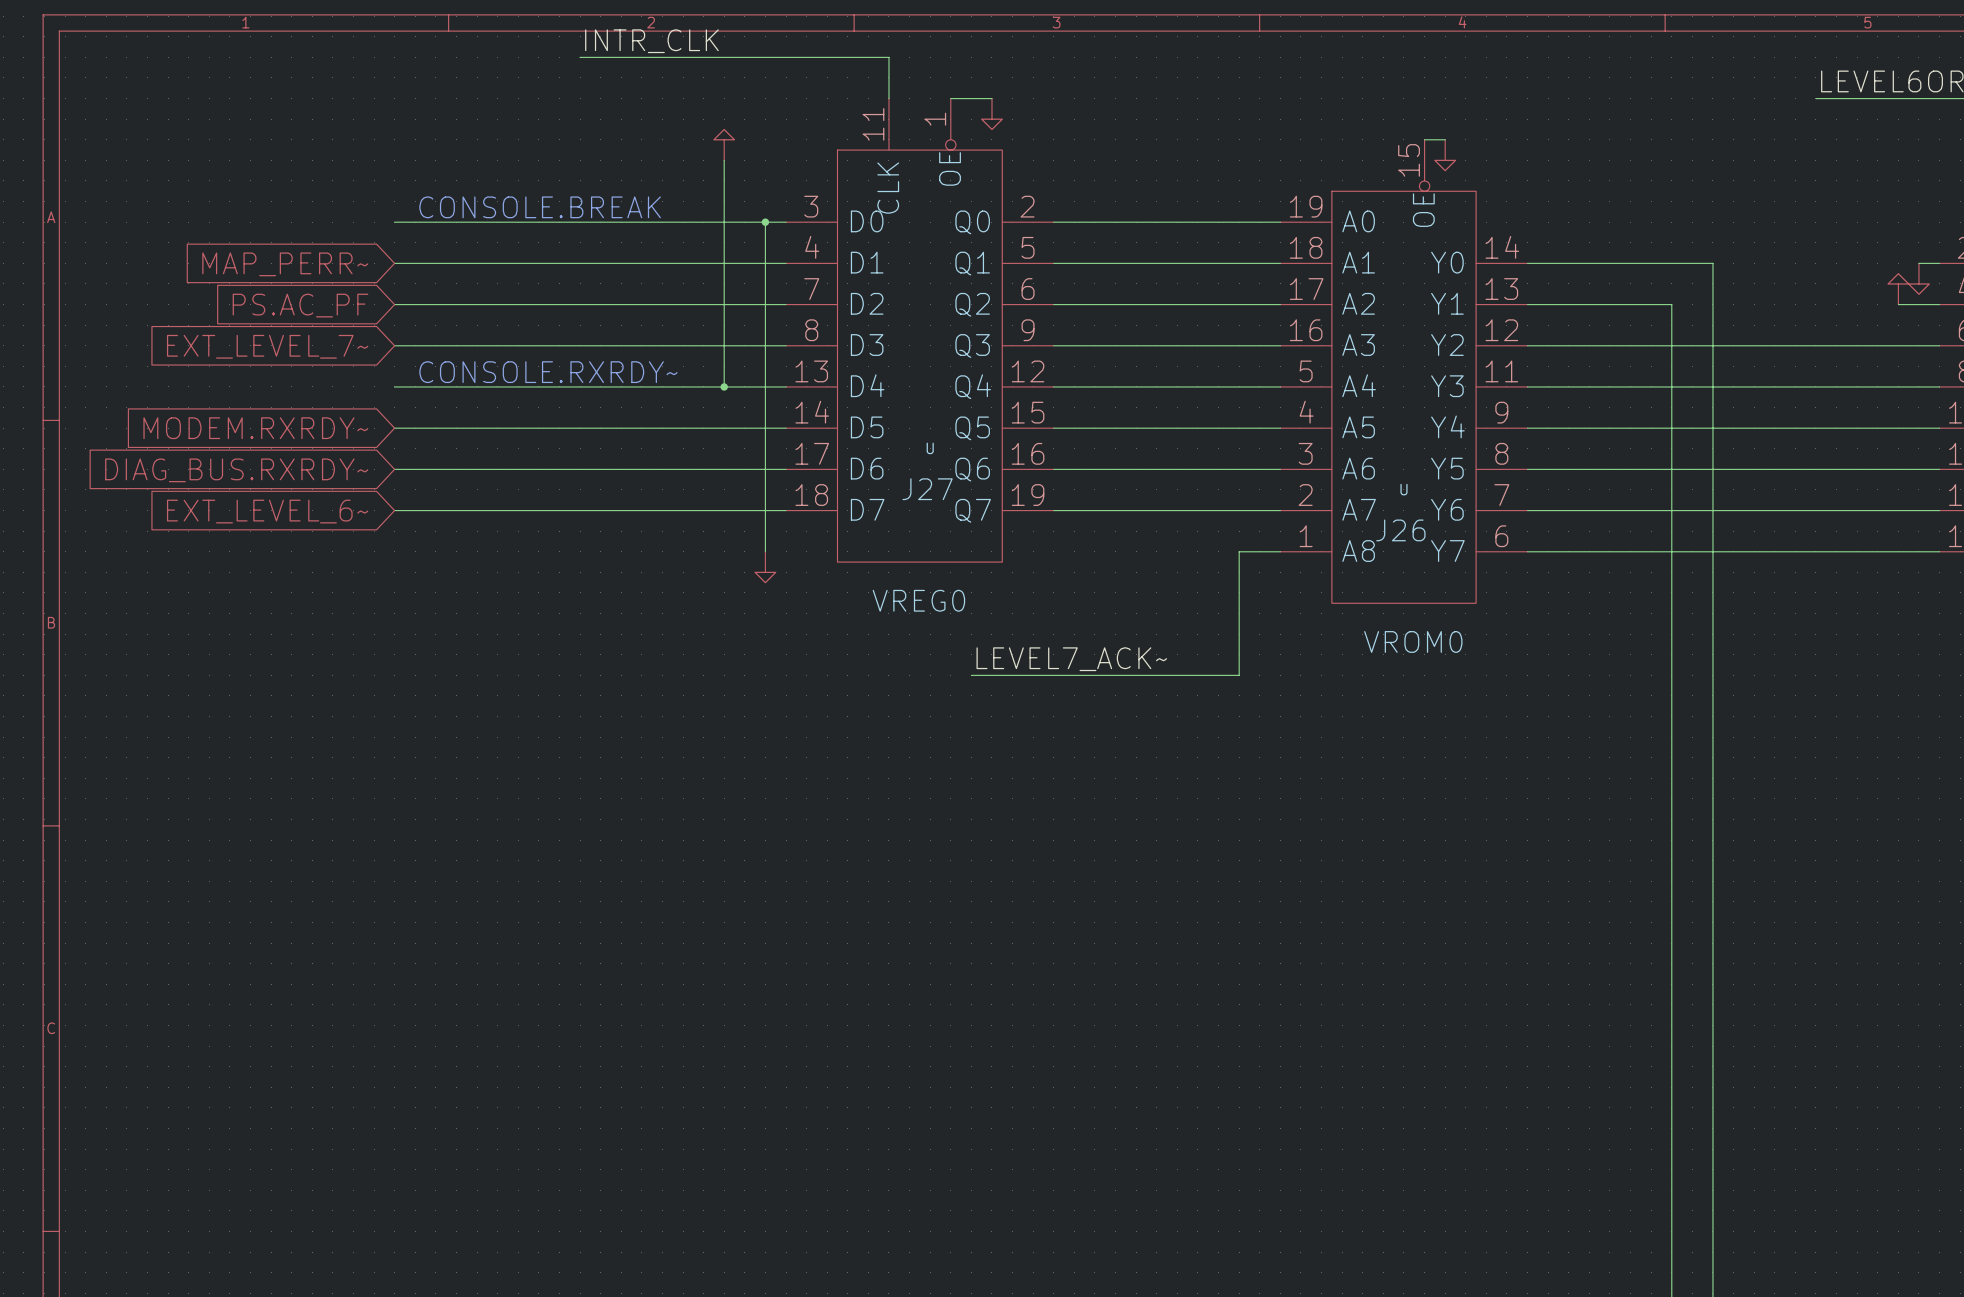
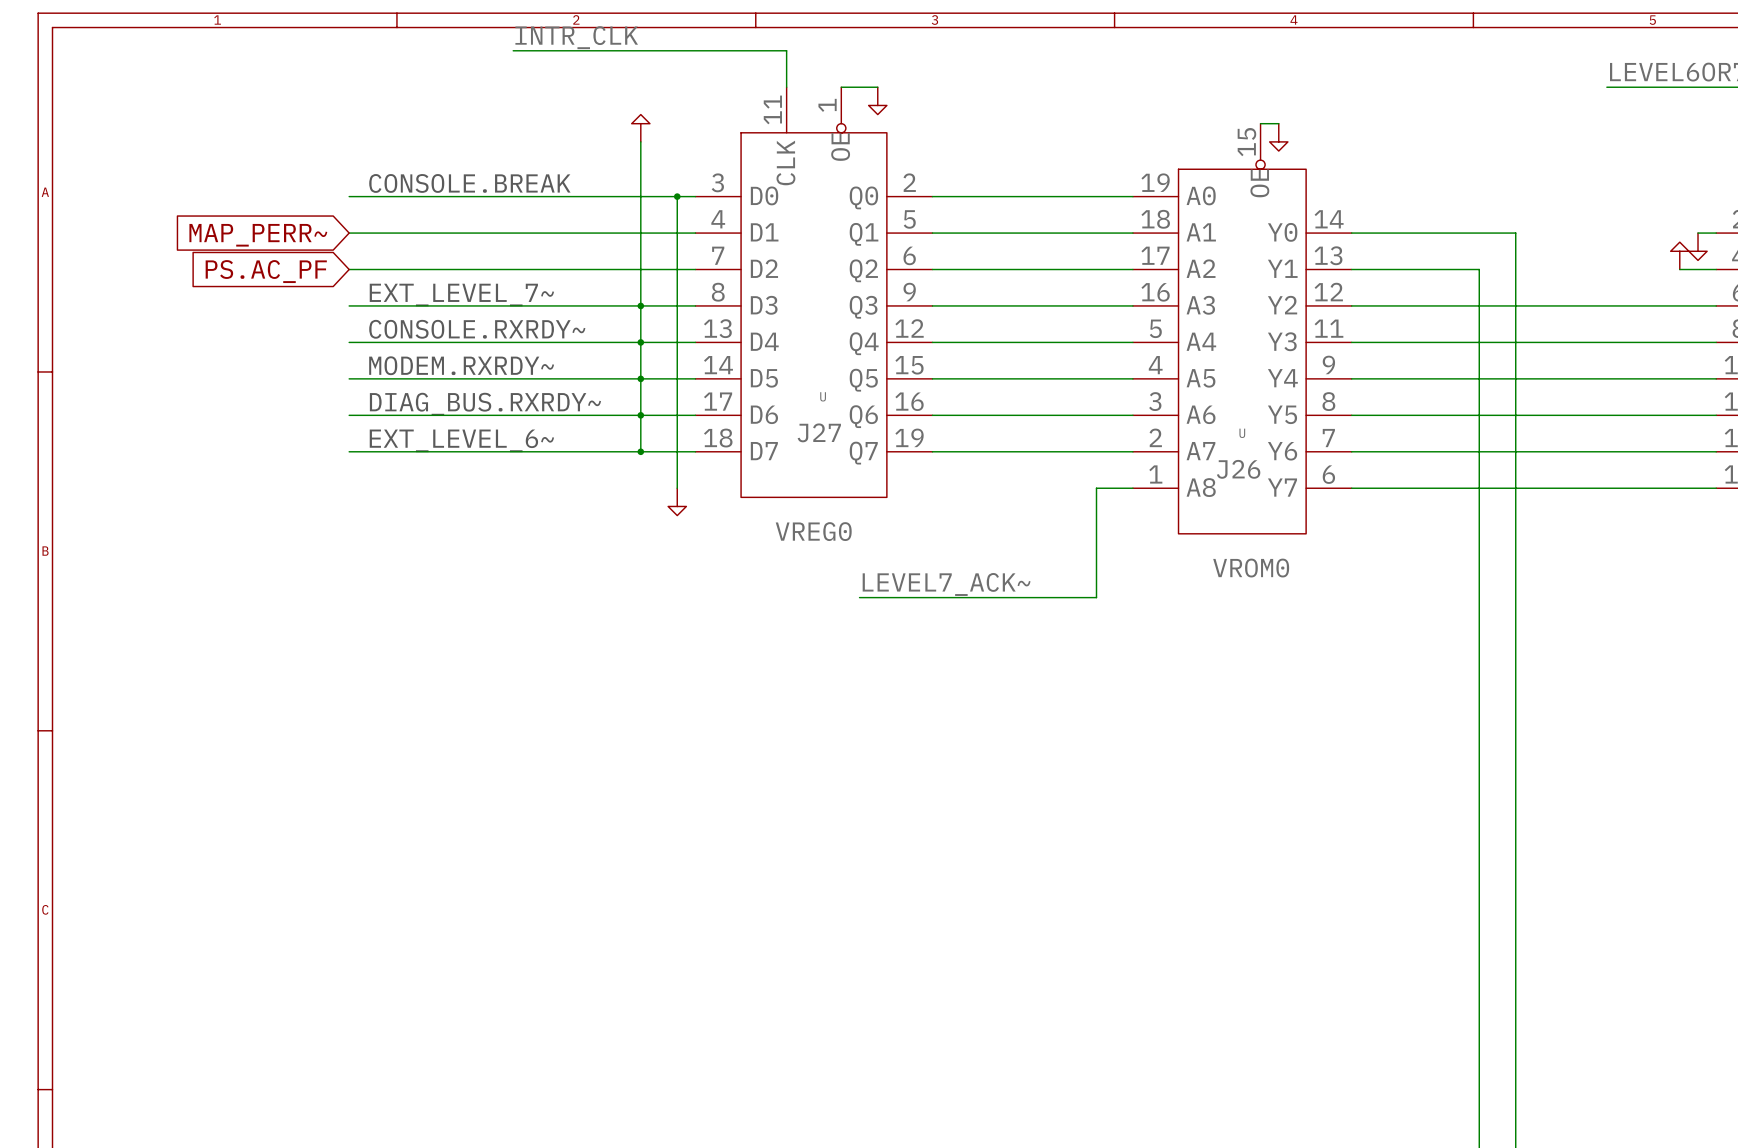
text: none -> EXT_LEVEL_7~ (461, 295)
junction: none -> (640, 305)
global label: EXT_LEVEL_7~ (267, 346) -> none
wire: none -> (640, 342) (640, 451)
text: none -> MODEM.RXRDY~ (461, 365)
global label: MODEM.RXRDY~ (255, 428) -> none
junction: none -> (640, 378)
text: none -> DIAG_BUS.RXRDY~ (485, 404)
junction: none -> (640, 415)
global label: DIAG_BUS.RXRDY~ (236, 470) -> none
text: none -> EXT_LEVEL_6~ (461, 440)
junction: none -> (640, 451)
global label: EXT_LEVEL_6~ (267, 511) -> none

